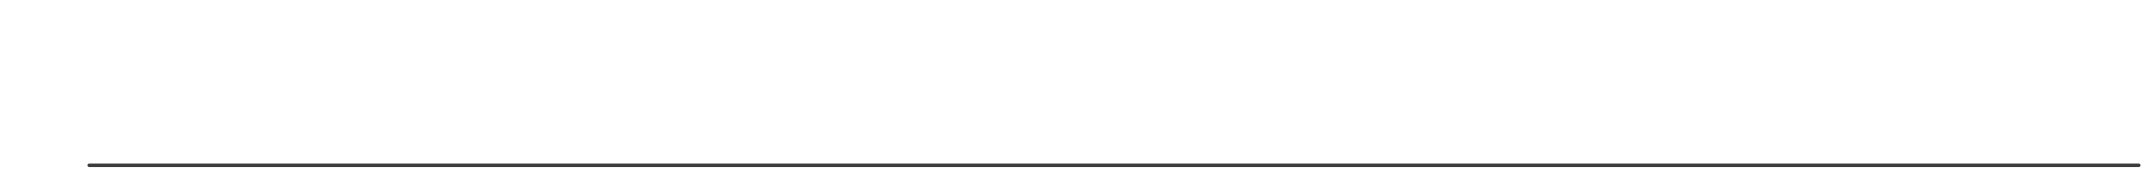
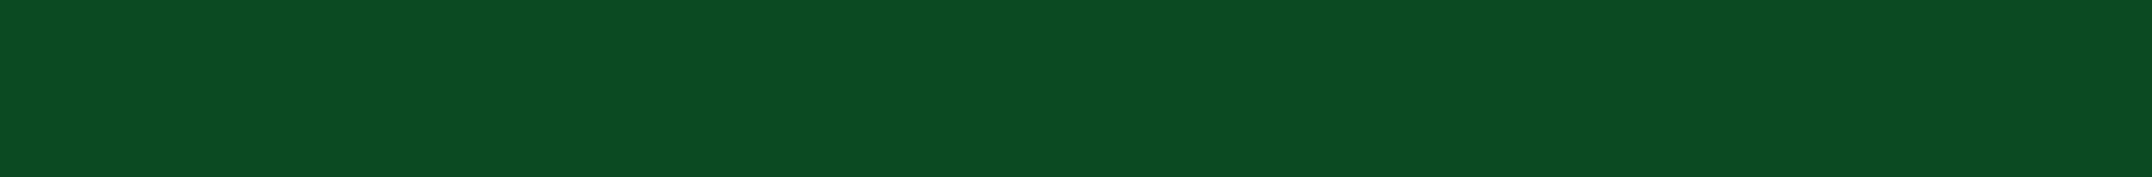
line: (89, 165) (2138, 165) -> none

